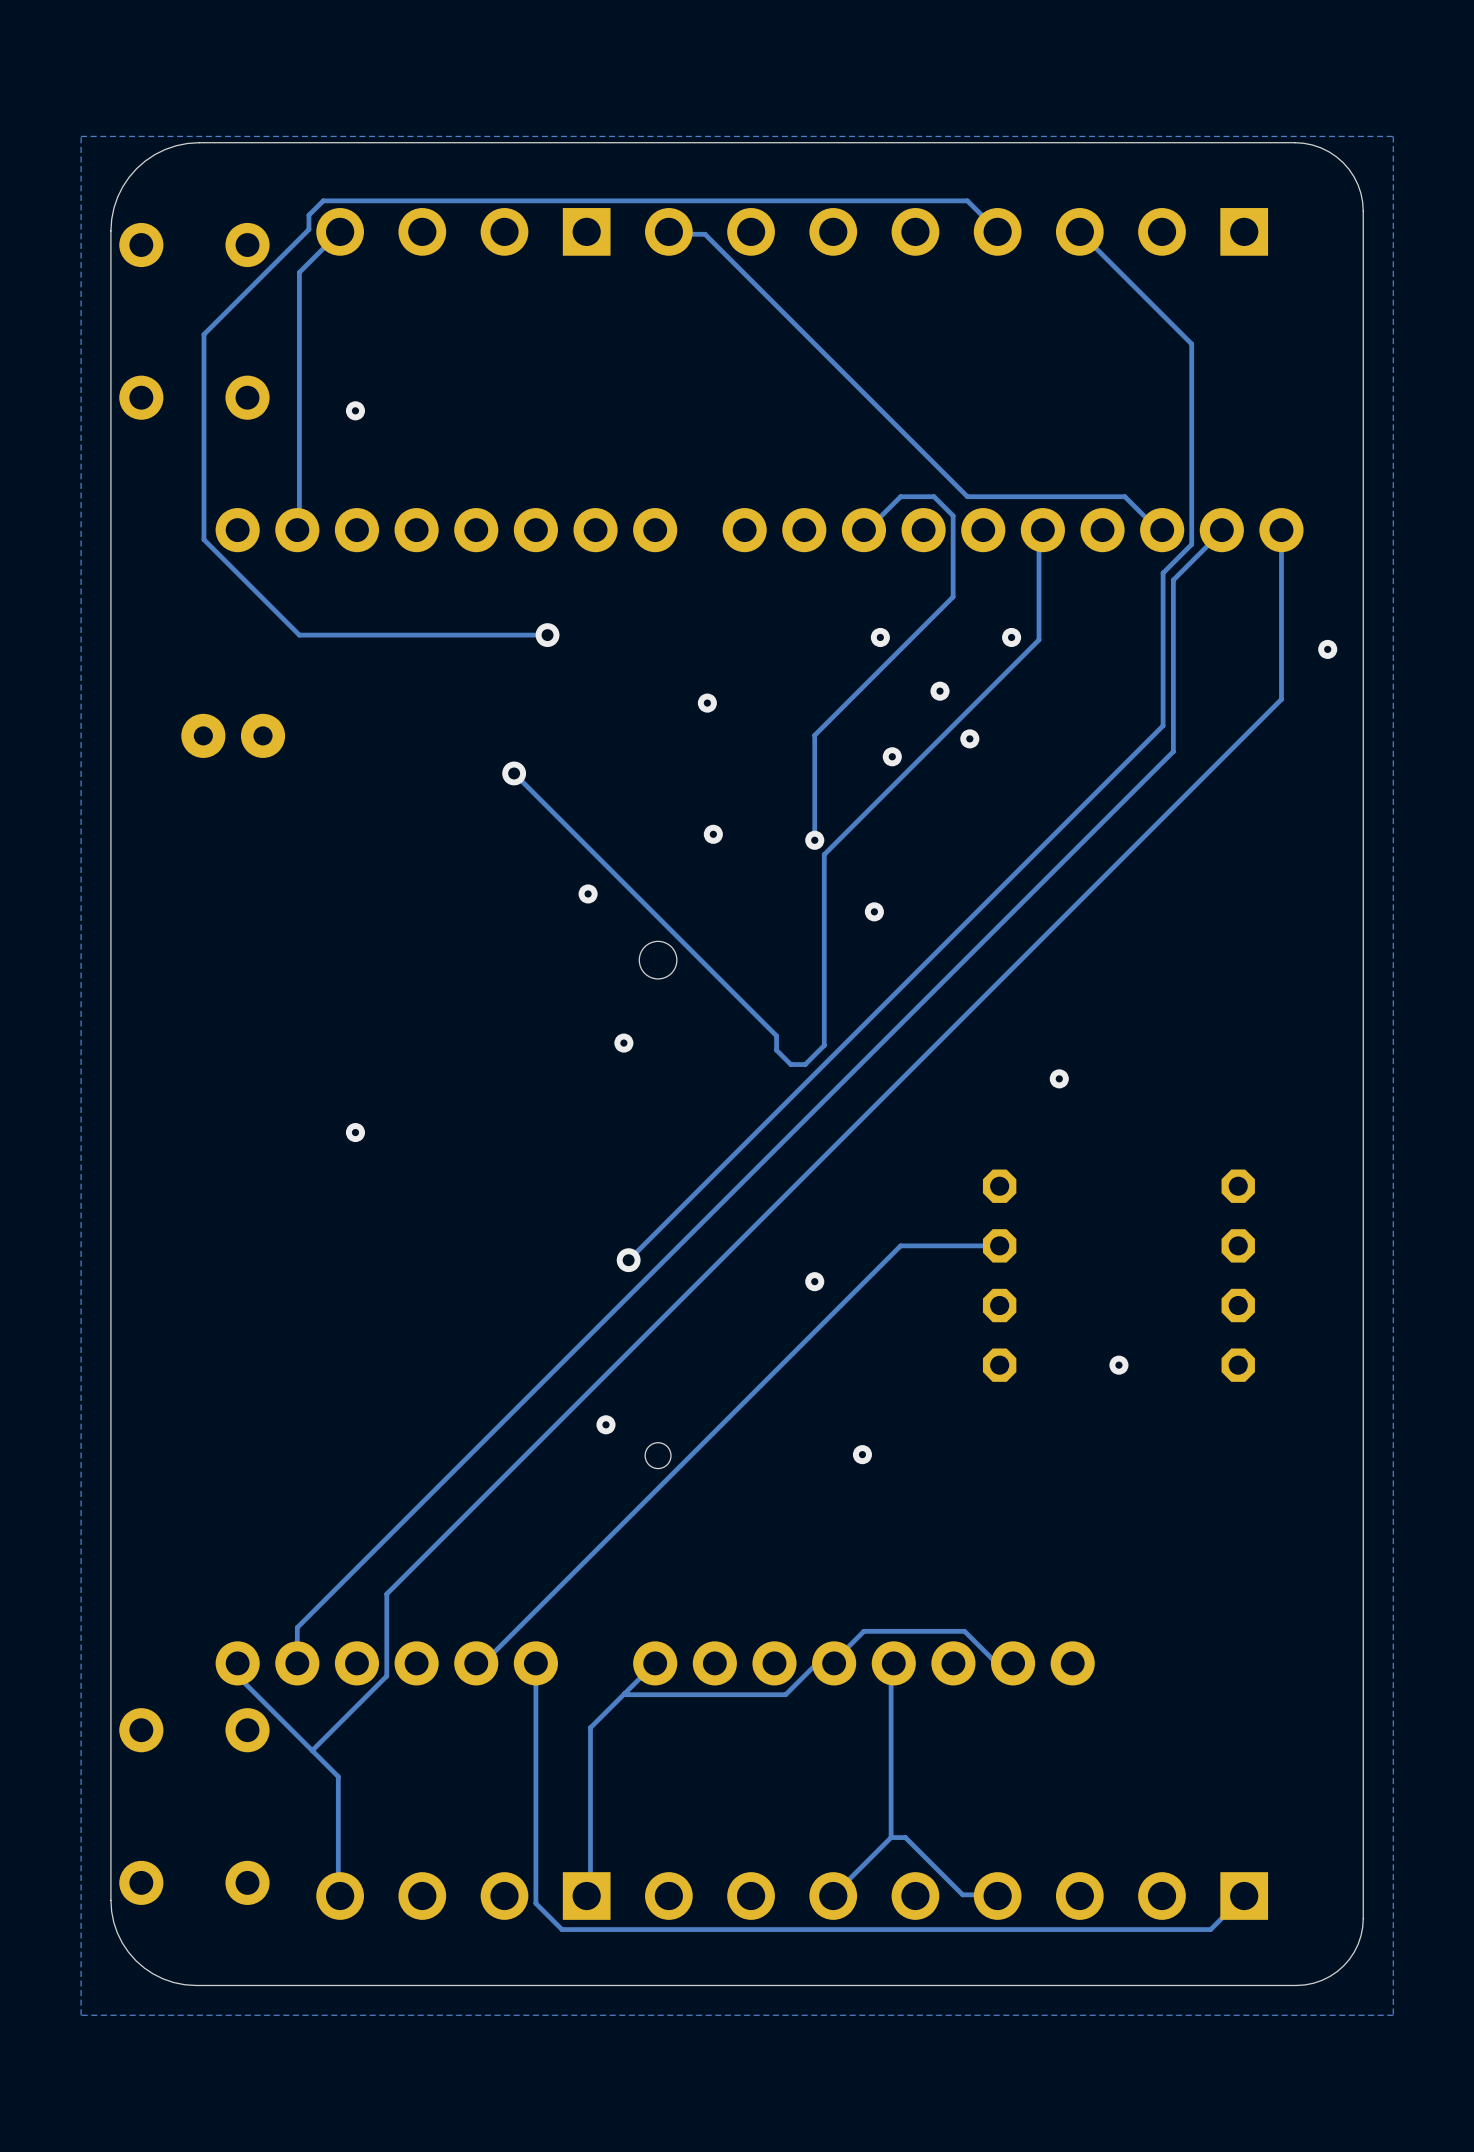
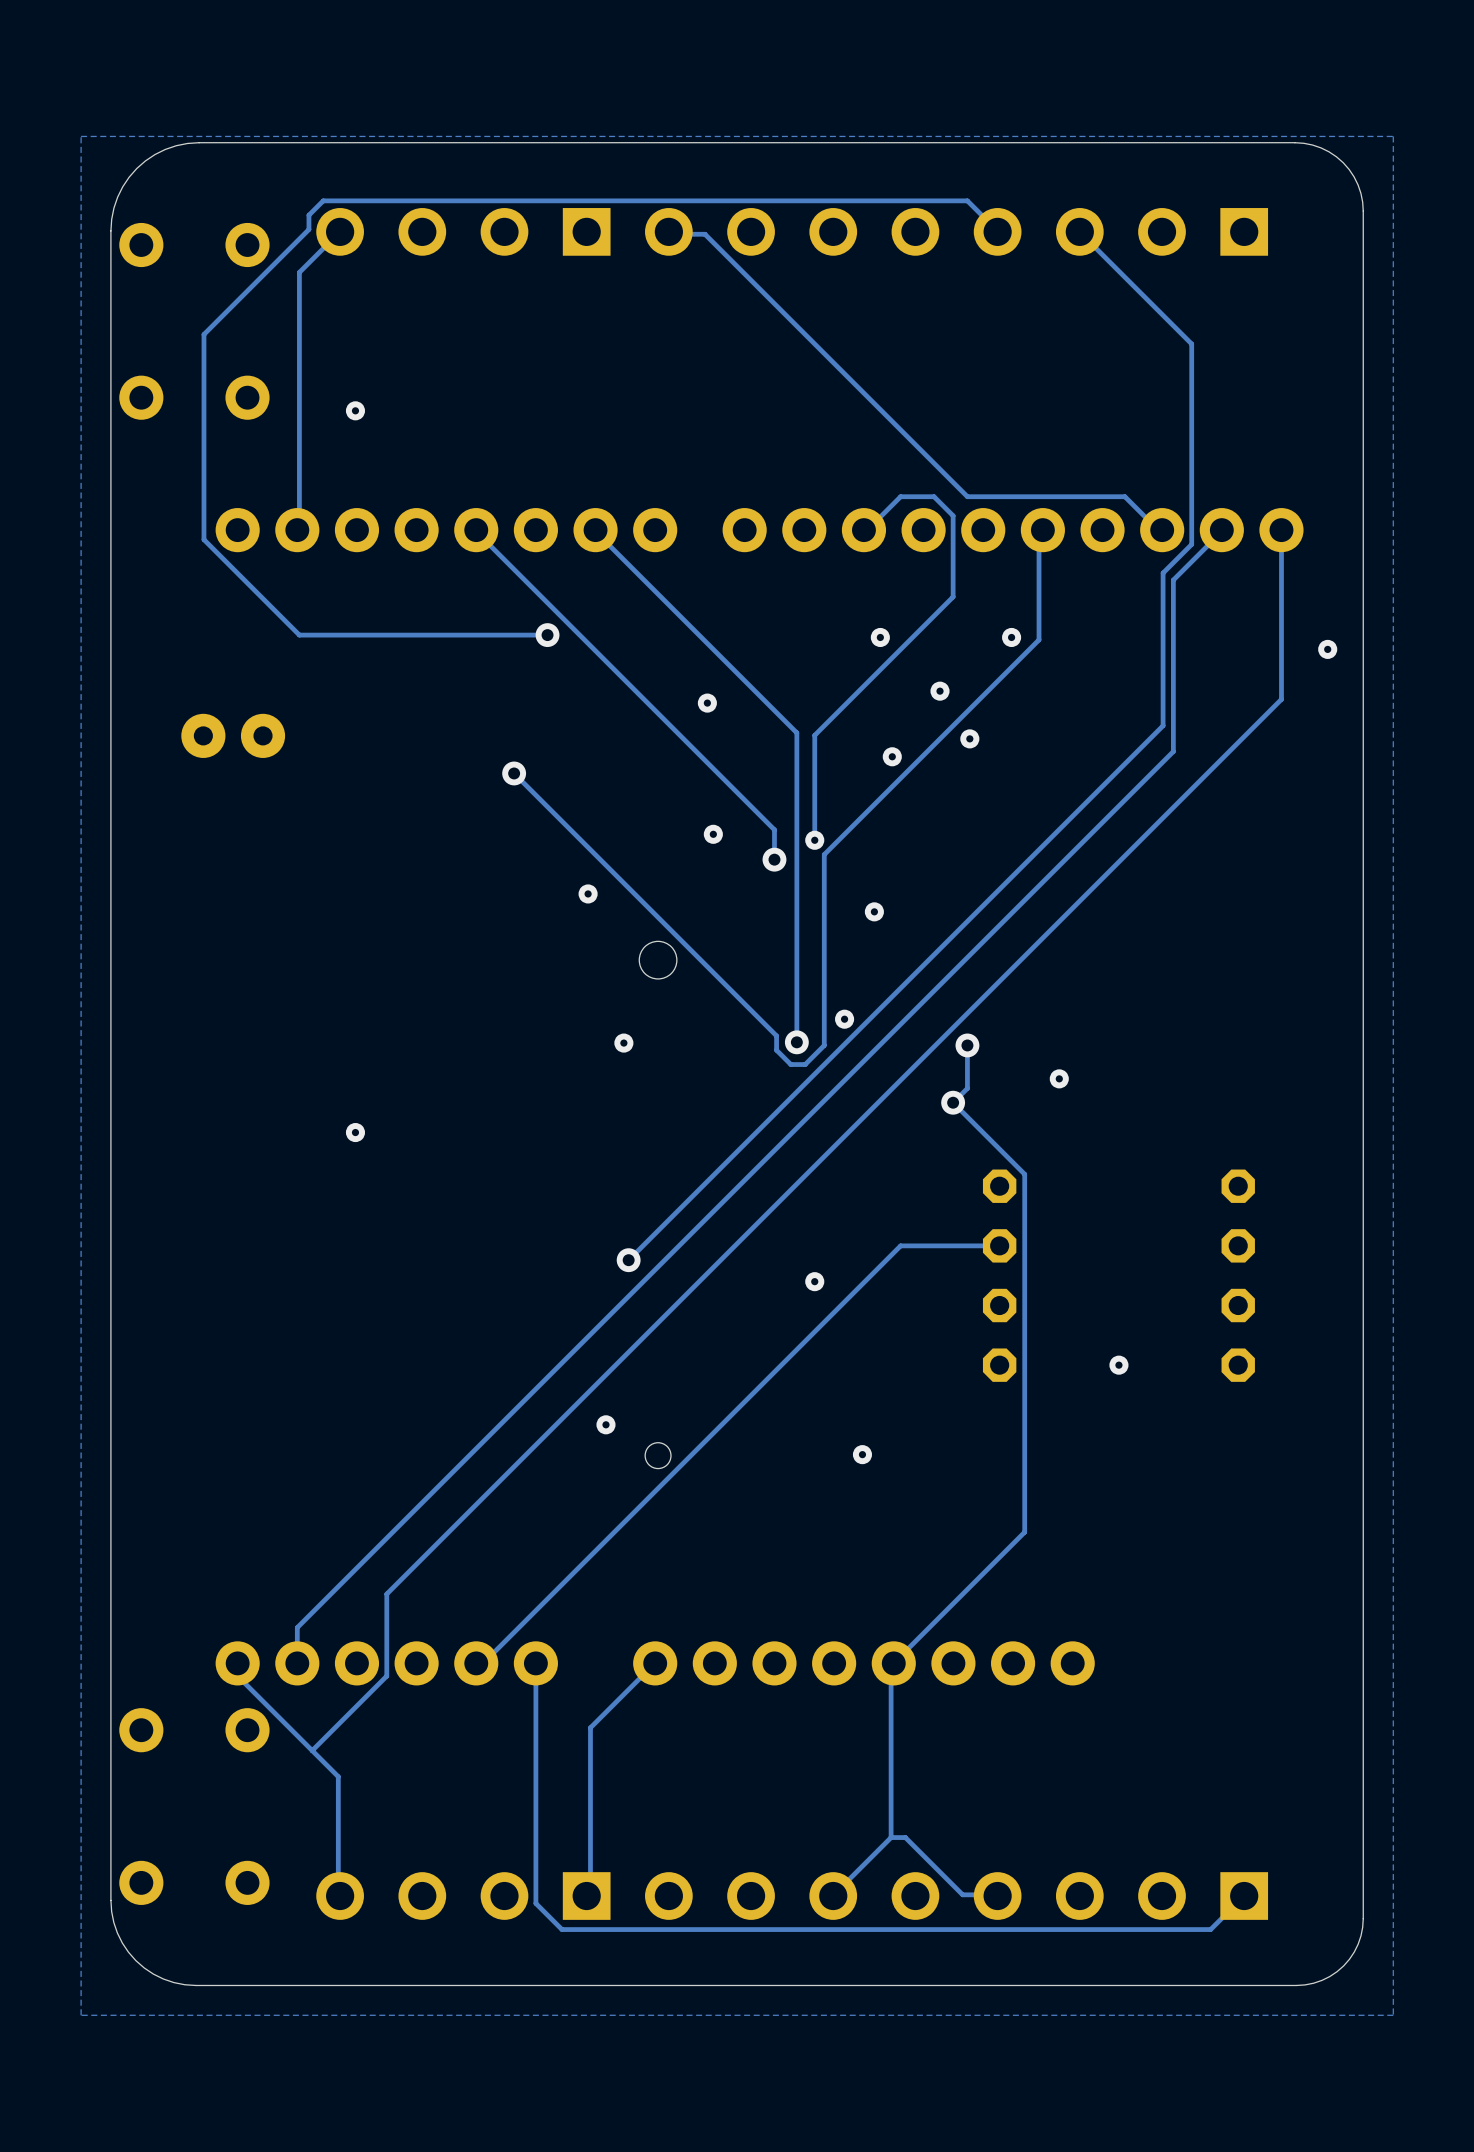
track: none -> (476, 530) (774, 829) (774, 859)
track: none -> (595, 530) (796, 732) (796, 1042)
via: none -> (774, 859)
via: none -> (844, 1019)
via: none -> (796, 1042)
track: none -> (967, 1045) (967, 1088) (953, 1102) (1024, 1174) (1024, 1532) (893, 1663)
via: none -> (967, 1045)
via: none -> (953, 1102)
track: (1013, 1663) (1013, 1661) (994, 1661) (964, 1631) (863, 1631) (834, 1661) (834, 1664) (815, 1664) (785, 1694) (624, 1693) -> none

